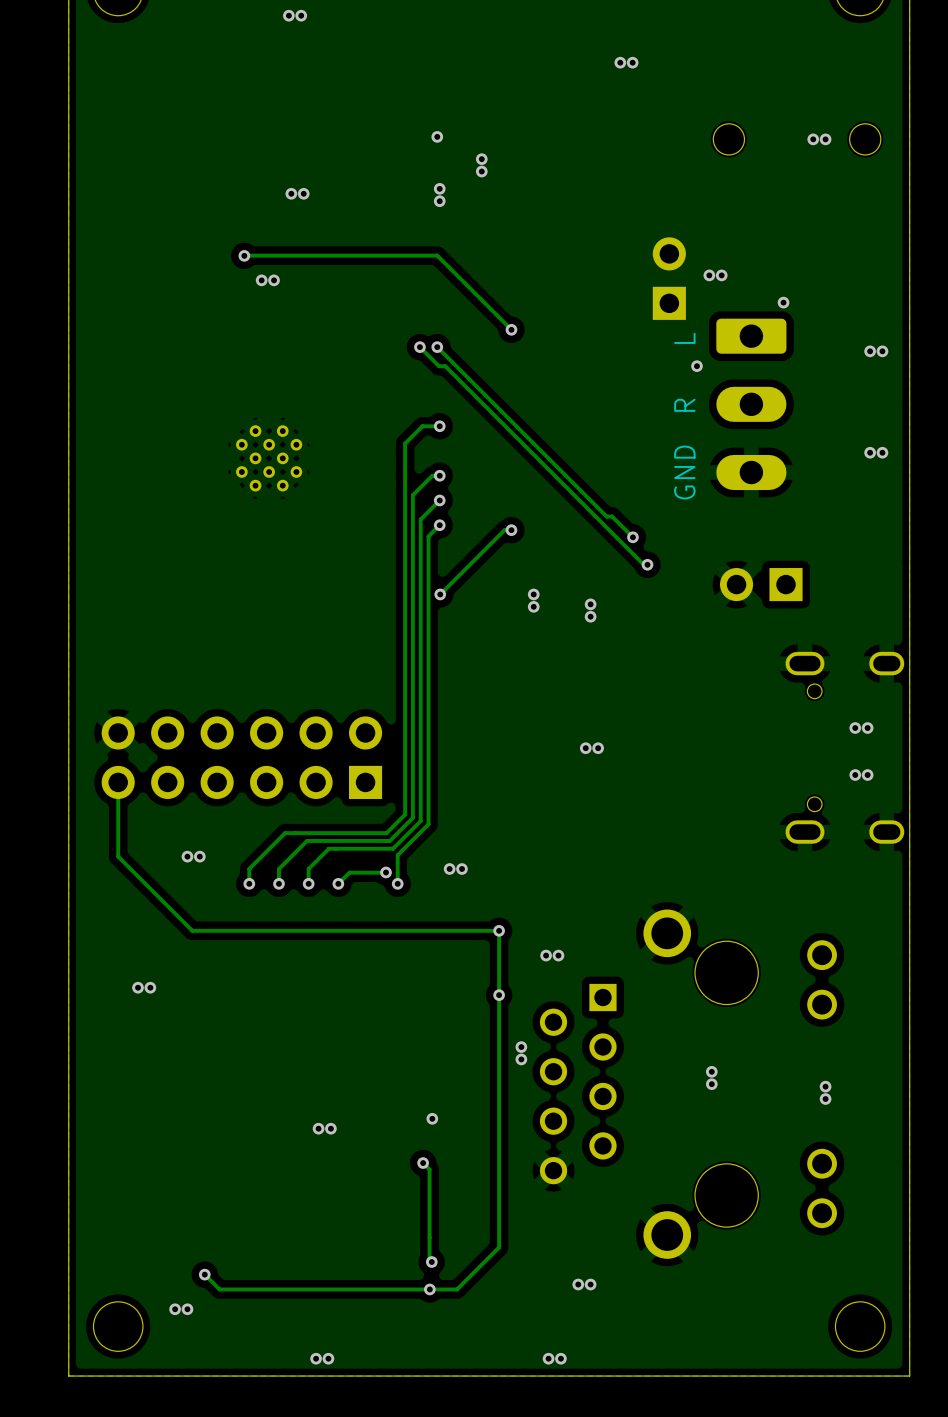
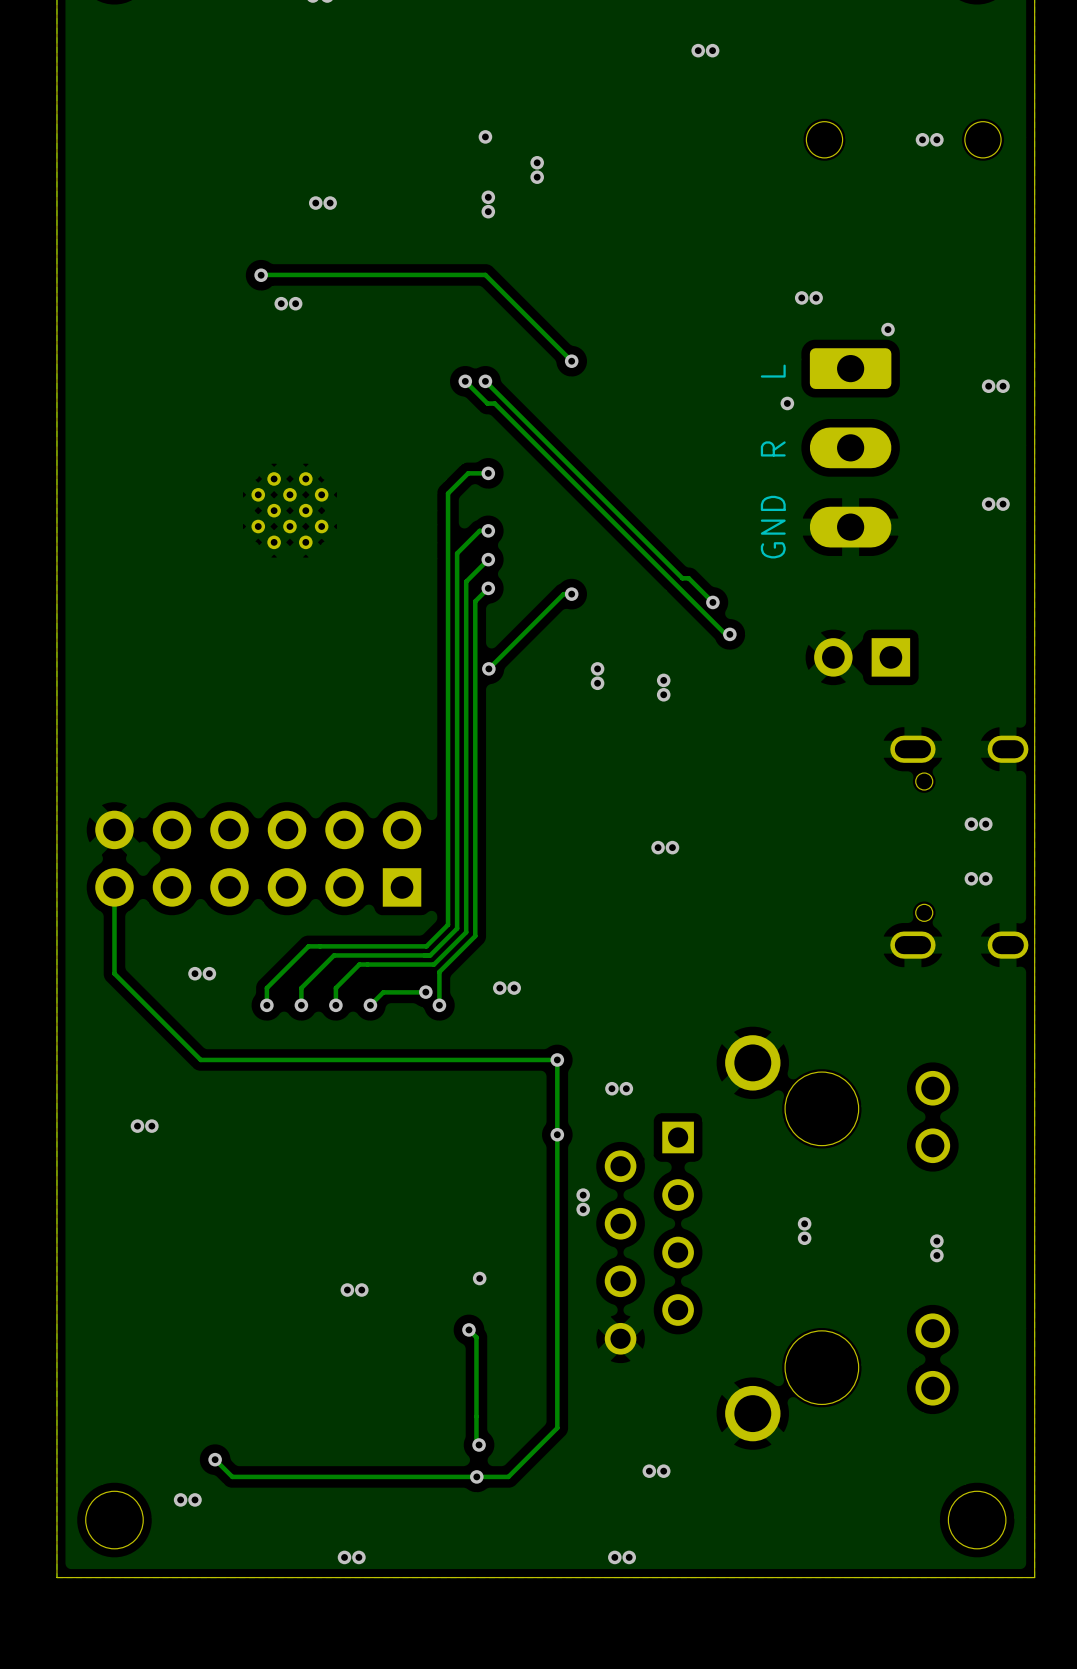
part: (669, 278) -> none

